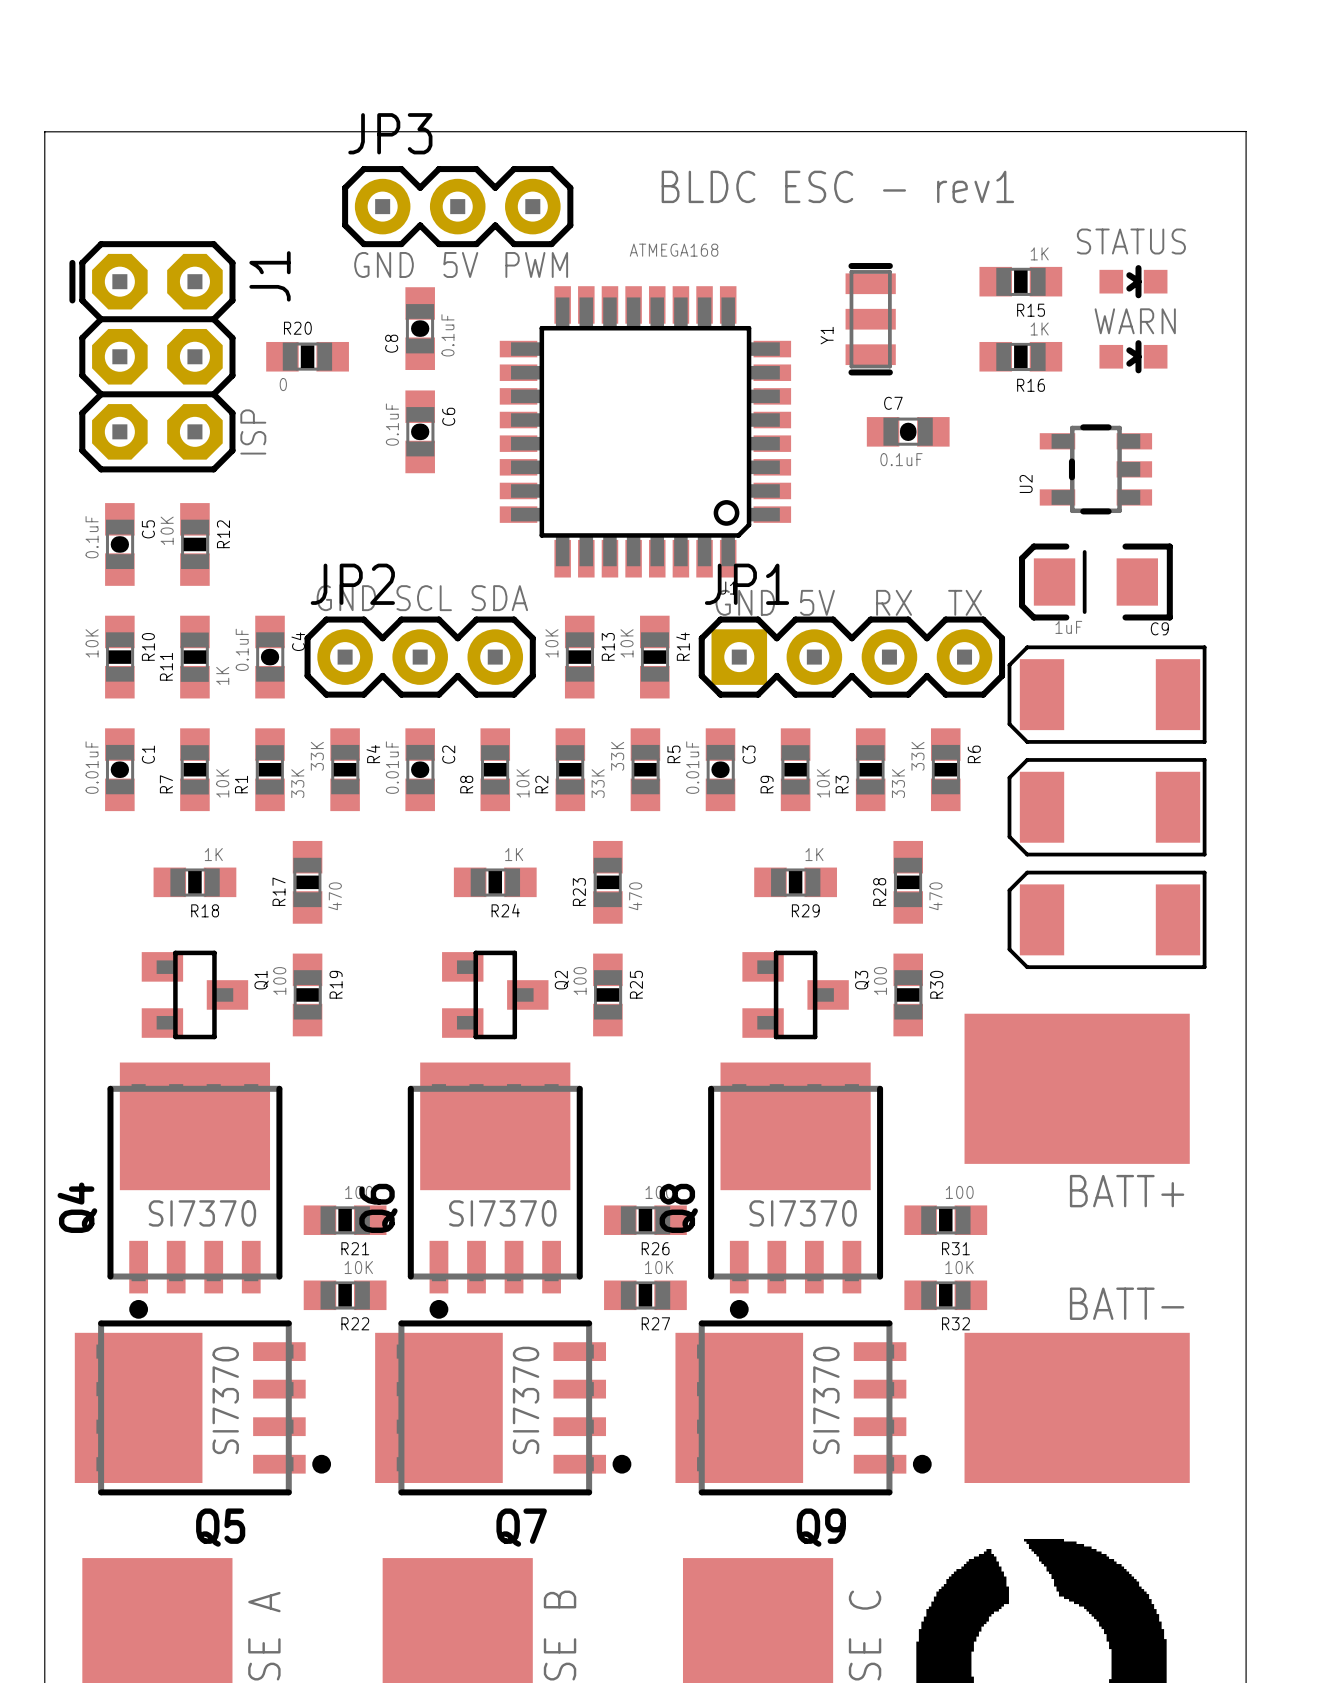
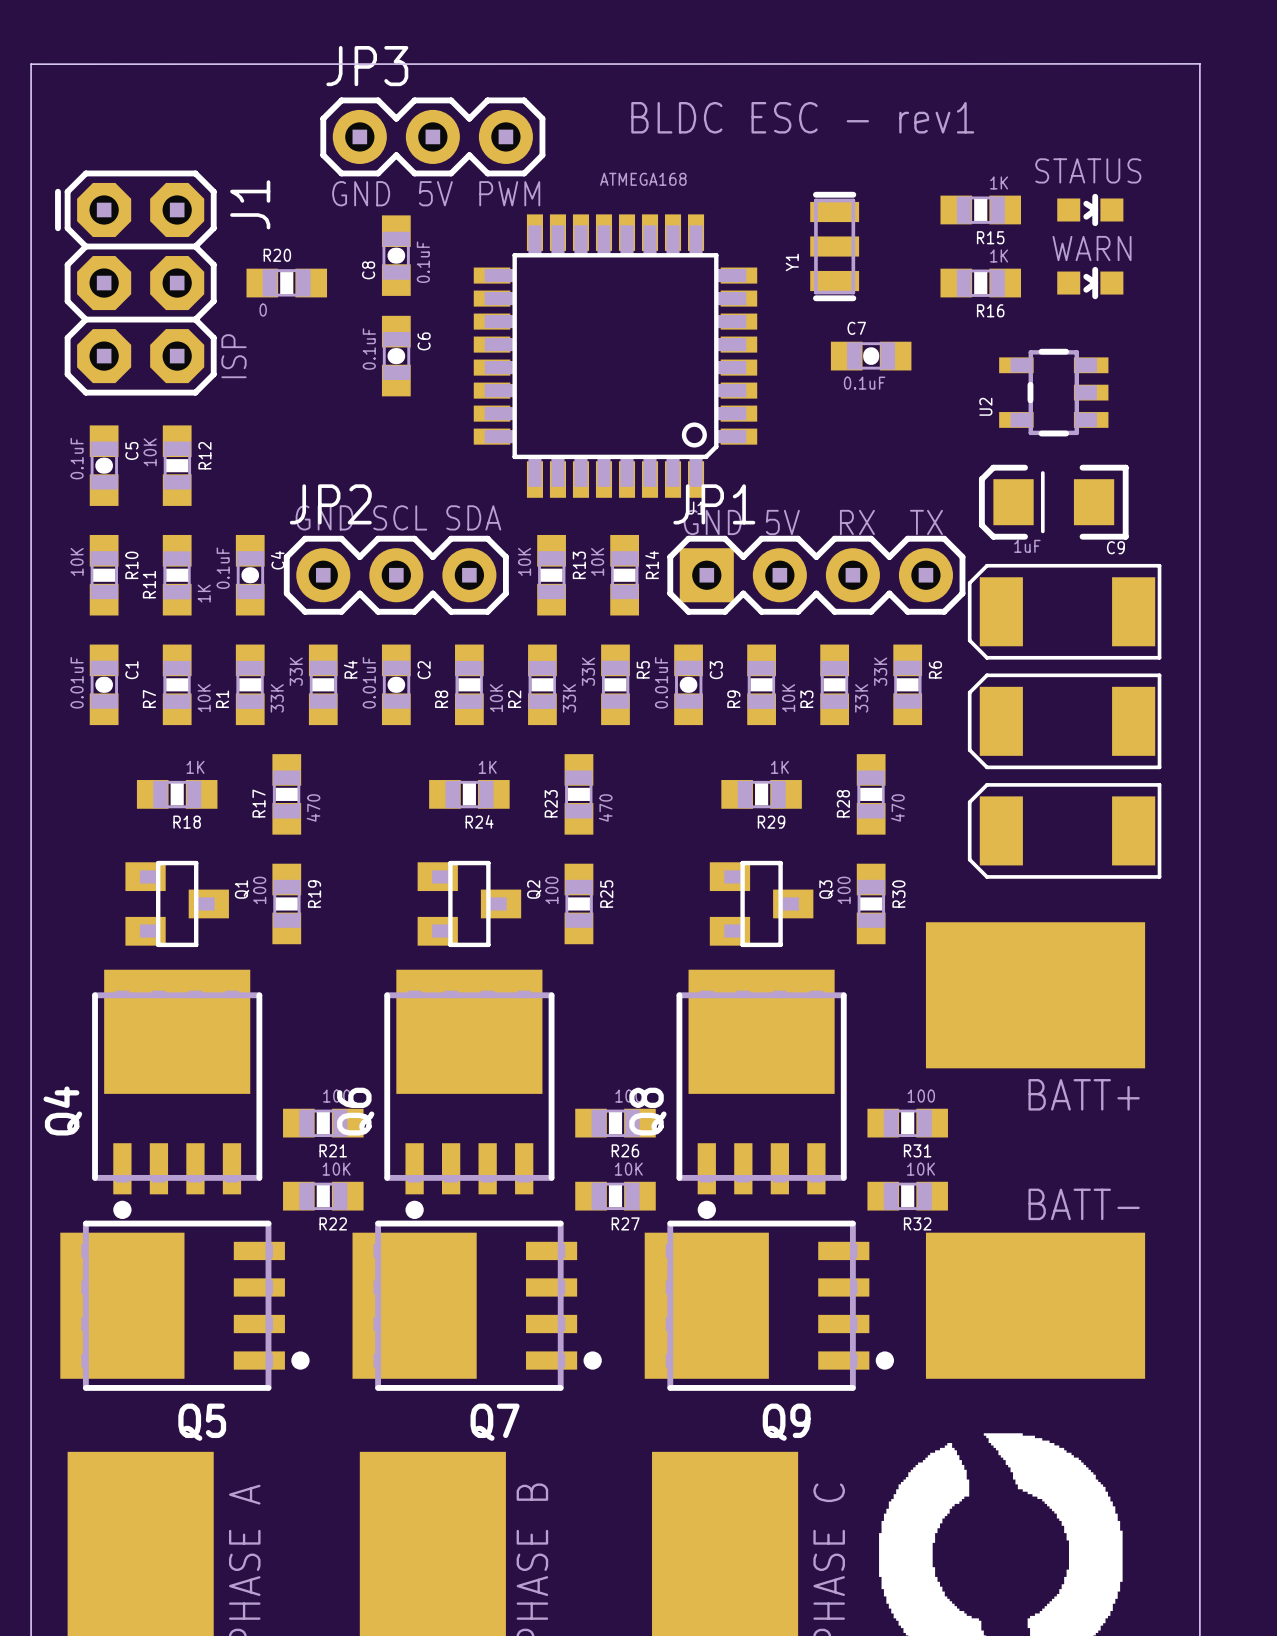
Q4 value: SI7370 (202, 1213) -> none
Q6 value: SI7370 (502, 1213) -> none
Q8 value: SI7370 (803, 1213) -> none
Q5 value: SI7370 (225, 1400) -> none
Q7 value: SI7370 (526, 1400) -> none
Q9 value: SI7370 (826, 1400) -> none

